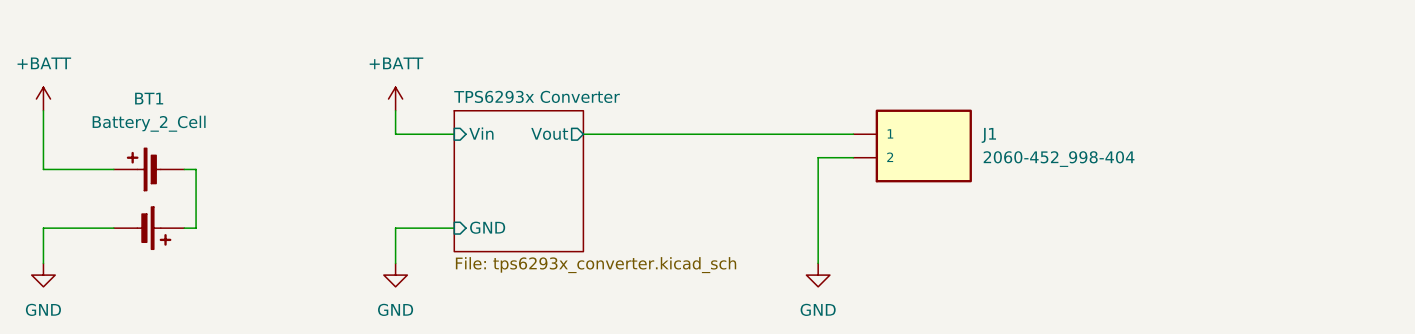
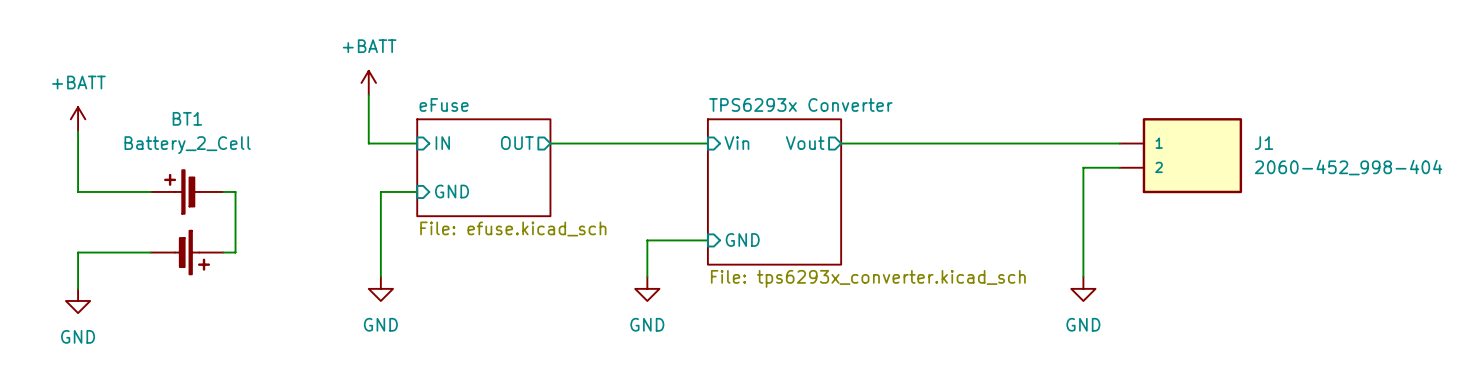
wire: none -> (368, 95) (368, 143) (417, 143)
power symbol position: +BATT (395, 99) -> +BATT (368, 82)
wire: (395, 110) (395, 134) (454, 134) -> none
sheet pin: none -> IN (442, 143)
sheet pin: none -> OUT (517, 143)
wire: none -> (550, 143) (707, 143)
sheet pin position: Vin (481, 133) -> Vin (736, 143)
sheet pin position: Vout (549, 133) -> Vout (805, 143)
wire: (583, 134) (853, 134) -> (841, 143) (1119, 143)
sheet eFuse: none -> File: efuse.kicad_sch (483, 167)
J1 position: (912, 145) -> (1180, 155)
wire: (853, 157) (818, 157) (818, 263) -> (1119, 167) (1083, 167) (1083, 276)
wire: none -> (417, 191) (380, 191) (380, 276)
sheet pin: none -> GND (452, 191)
sheet TPS6293x Converter position: (518, 181) -> (774, 191)
sheet pin: none -> GND (742, 239)
sheet pin: GND (487, 227) -> none
wire: (454, 228) (395, 228) (395, 263) -> (707, 240) (647, 240) (647, 276)
power symbol: none -> GND (647, 288)
power symbol: none -> GND (1083, 288)
power symbol position: GND (395, 275) -> GND (380, 288)
power symbol: GND (818, 275) -> none

